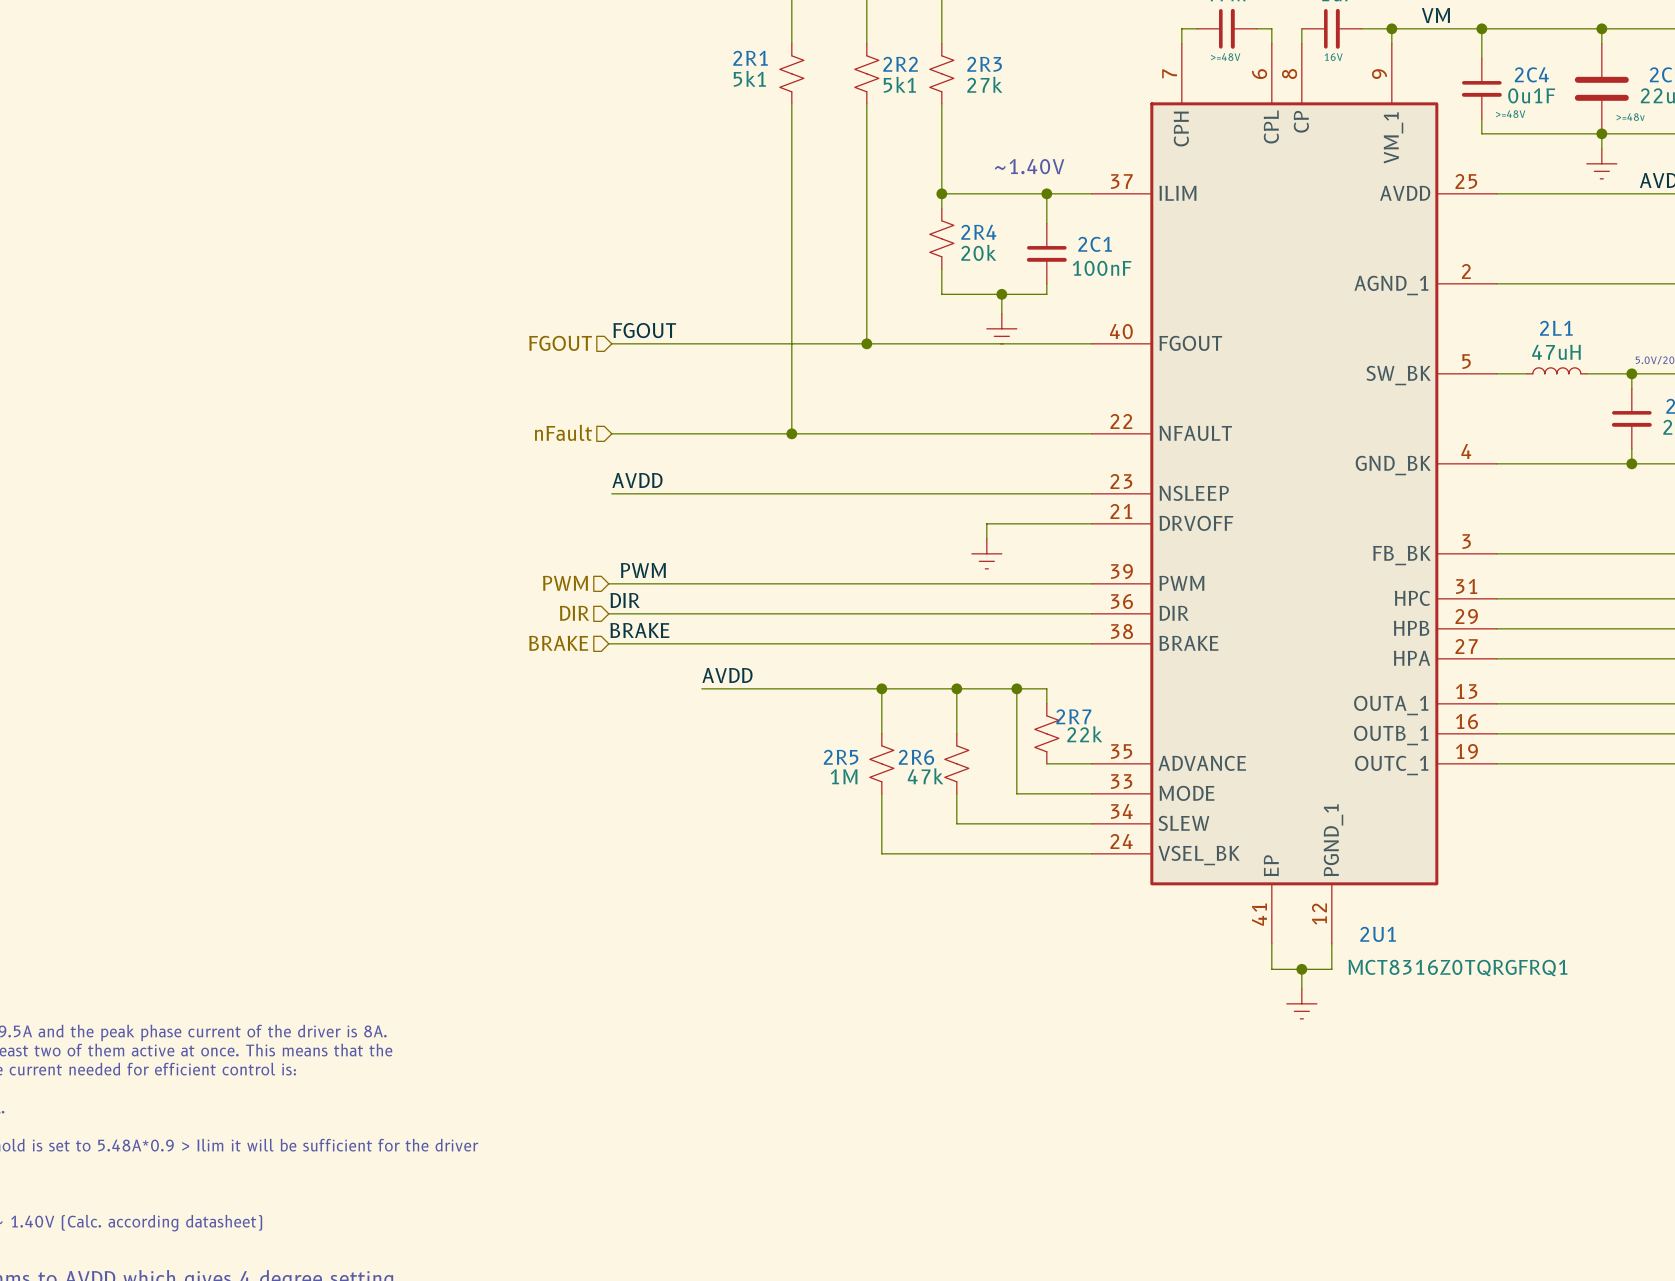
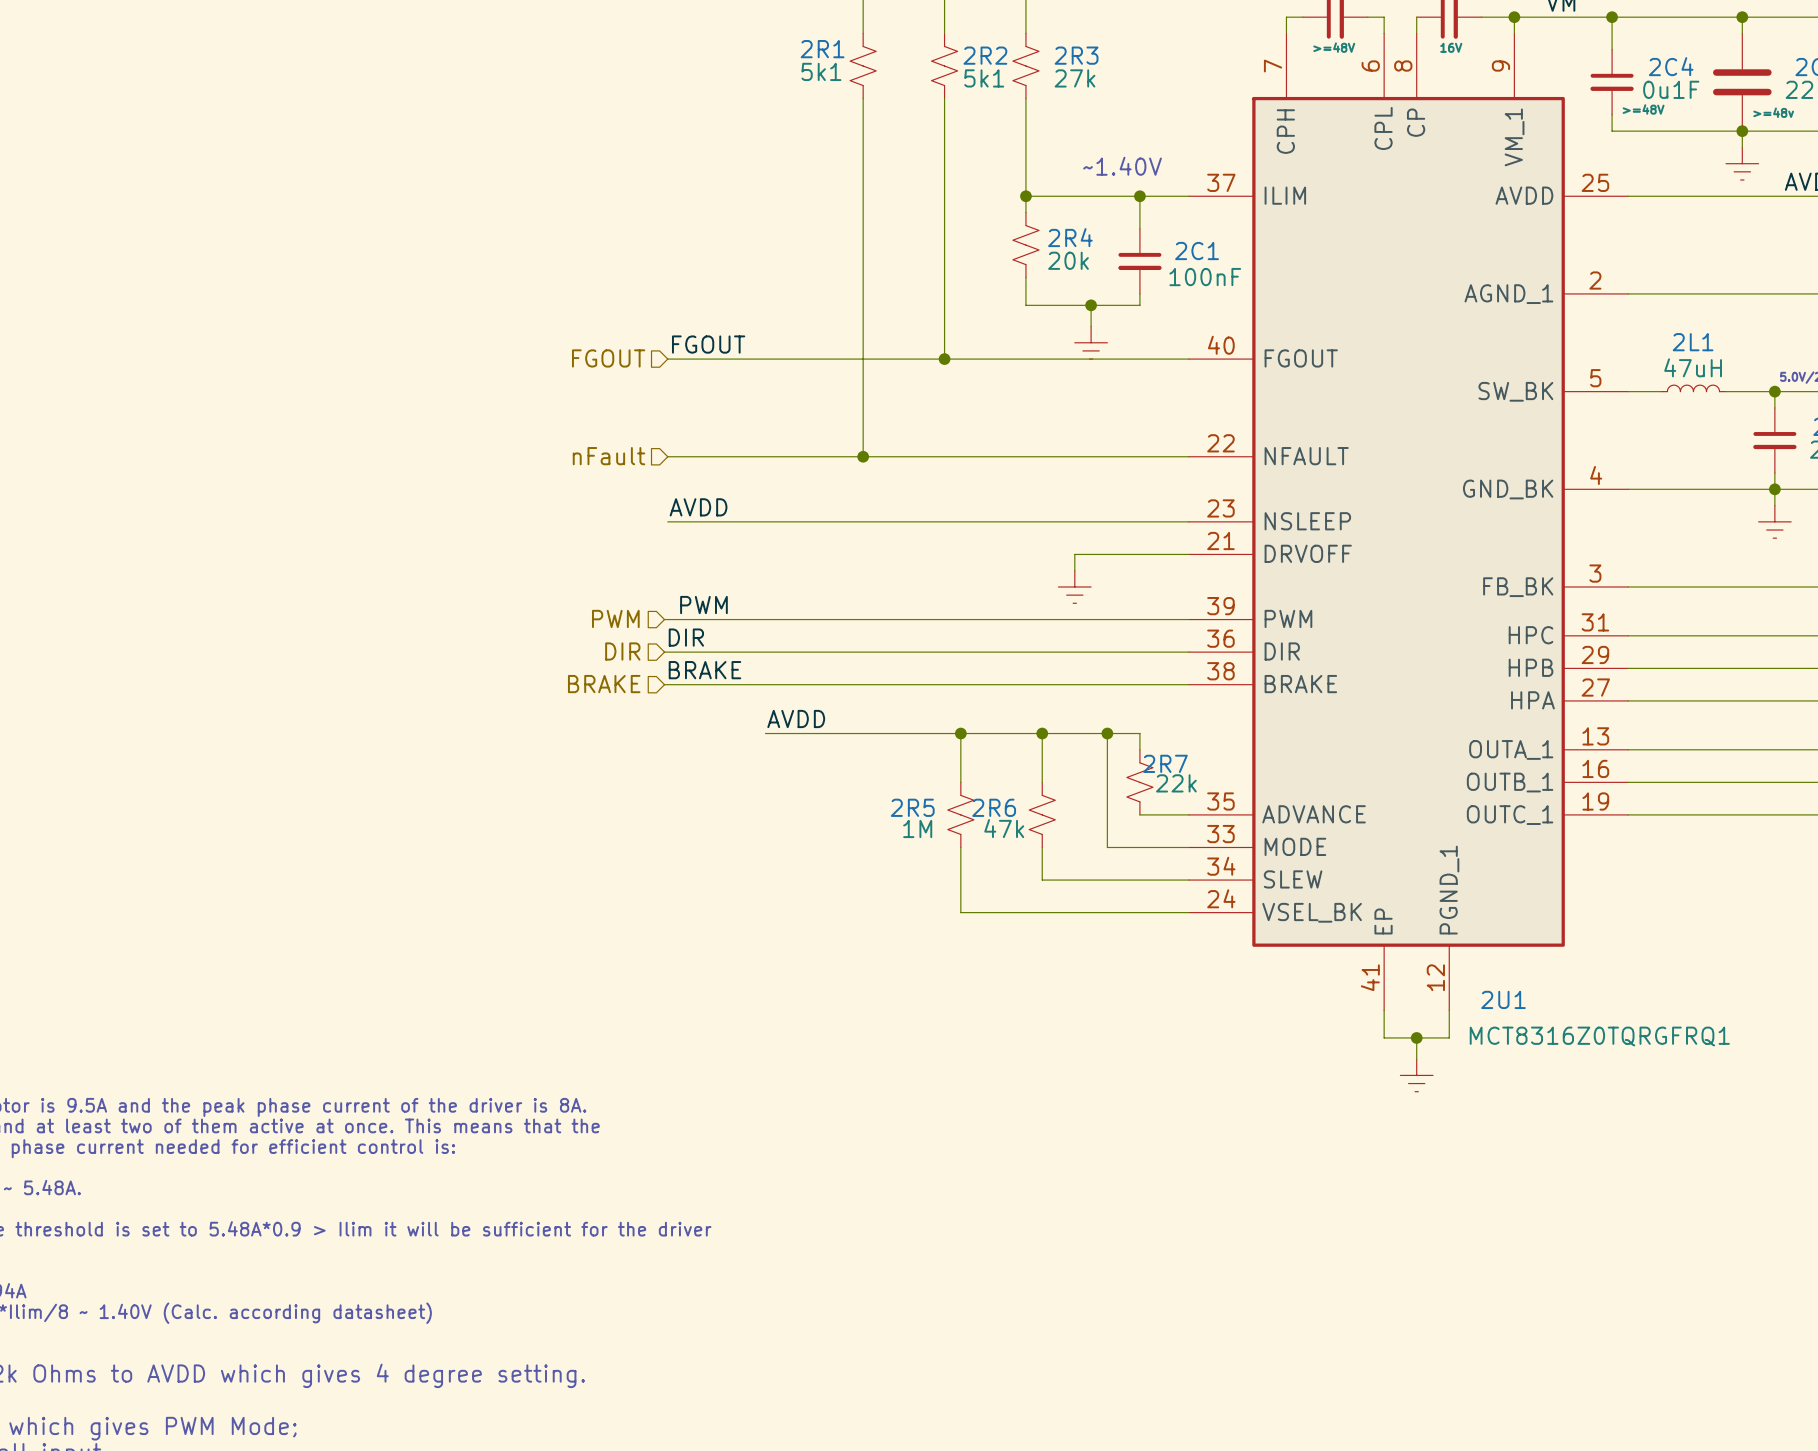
wire: none -> (1774, 489) (1774, 505)
power symbol: none -> (1774, 521)

